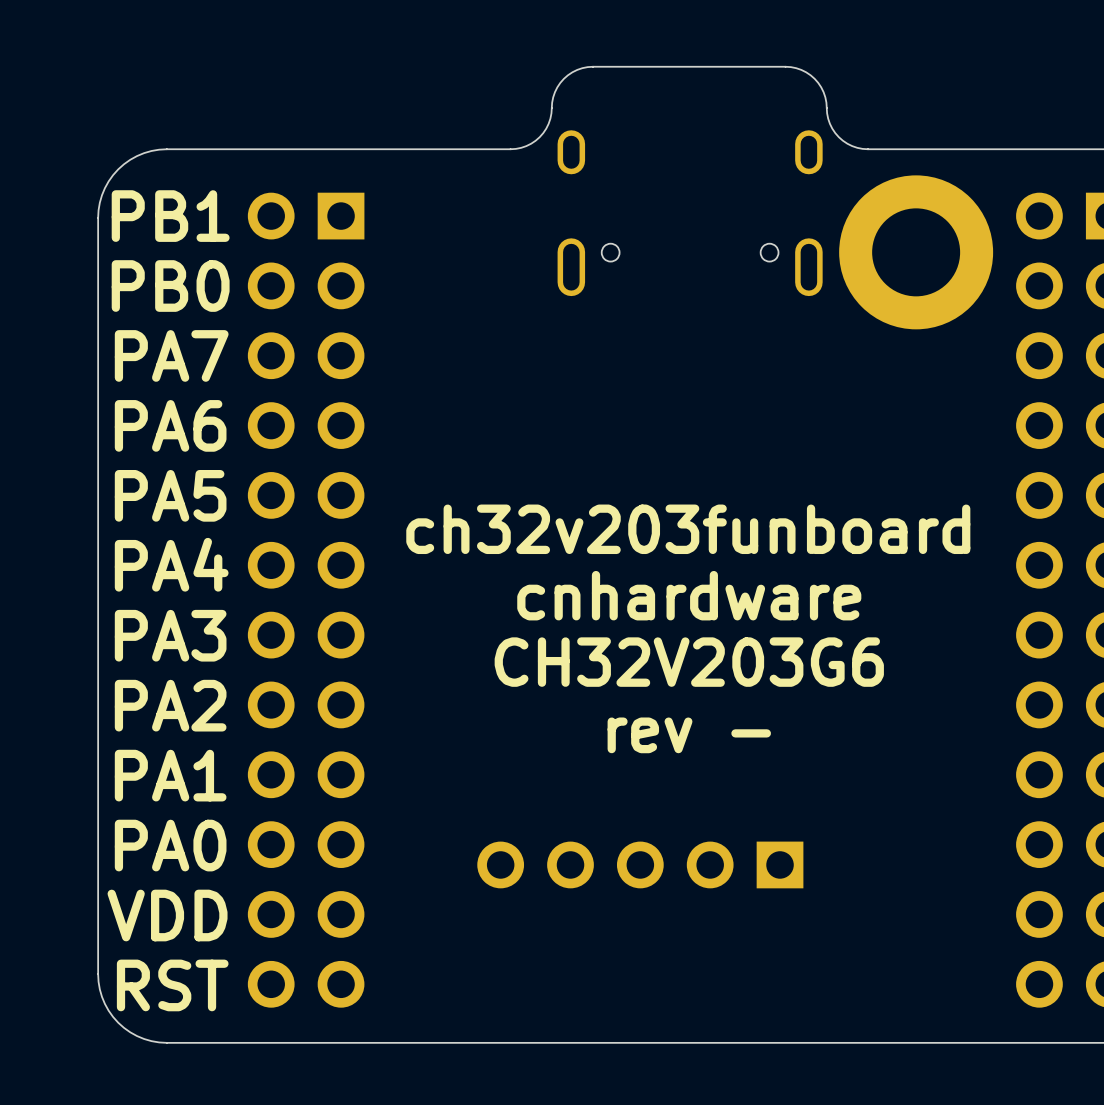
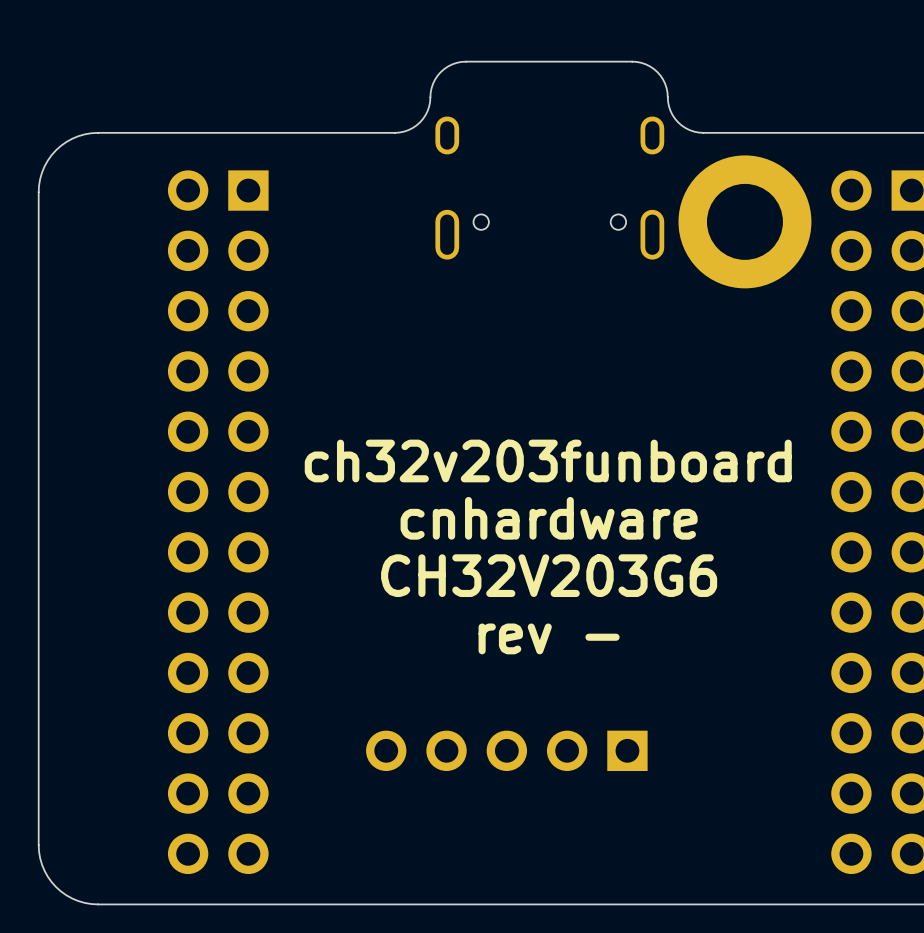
text: PB1 (170, 216) -> none
text: PB0 (170, 286) -> none
text: PA7 (171, 355) -> none
text: PA6 (170, 425) -> none
text: PA5 (170, 495) -> none
text: PA4 (171, 564) -> none
text: PA3 (170, 635) -> none
text: PA2 (170, 705) -> none
text: PA1 (170, 775) -> none
text: PA0 (170, 845) -> none
text: VDD (167, 915) -> none
text: RST (172, 985) -> none

